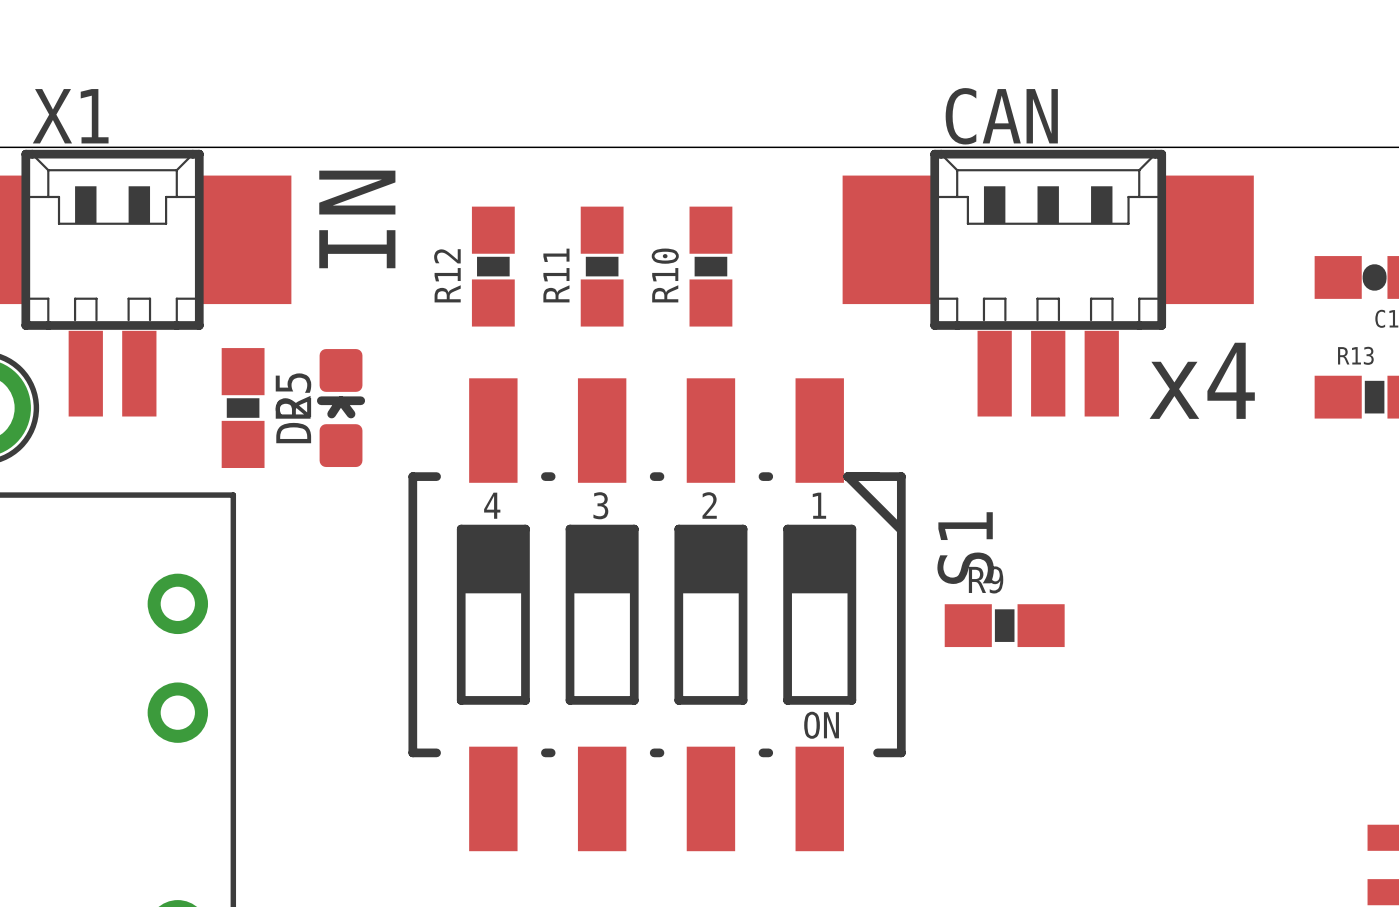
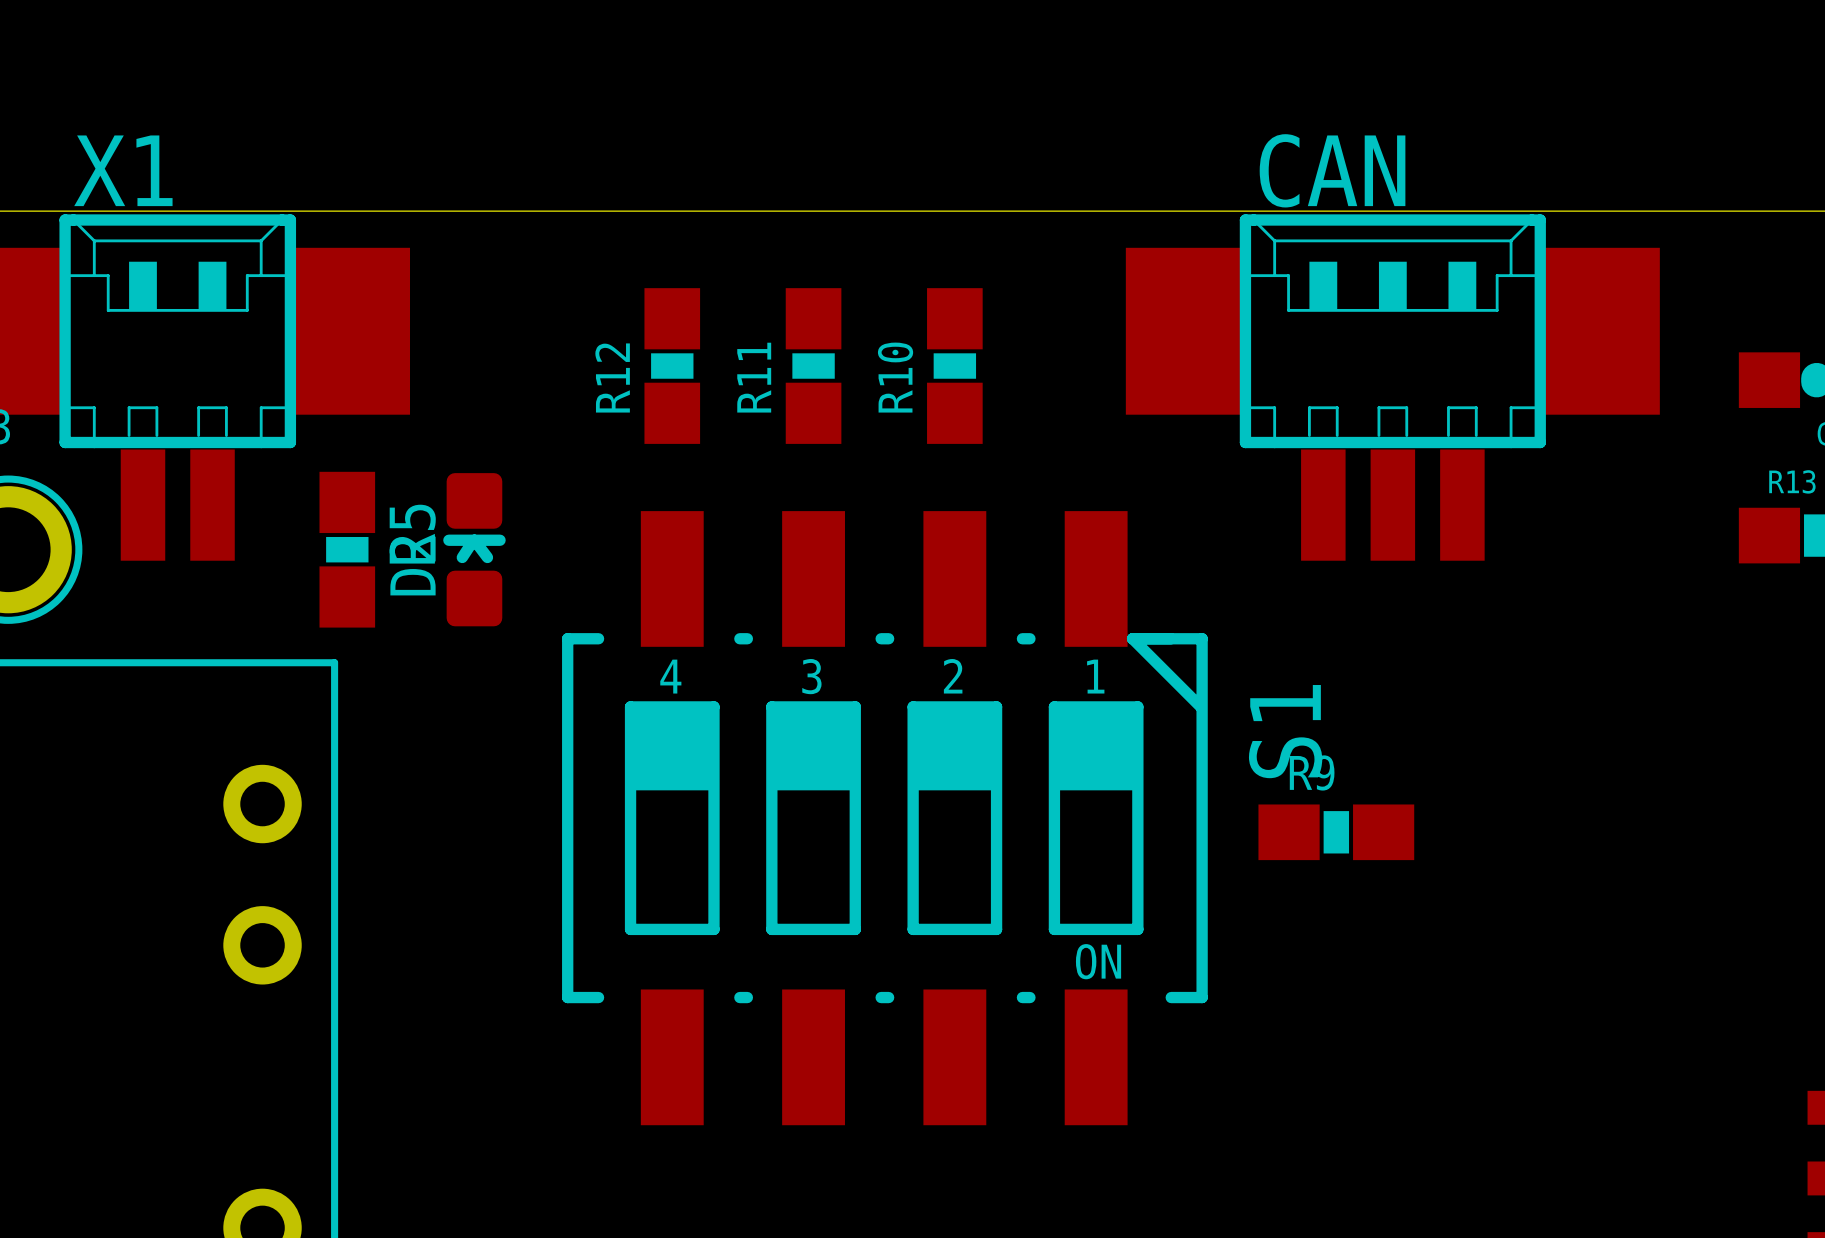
text: IN (357, 219) -> none
text: x4 (1202, 380) -> none

